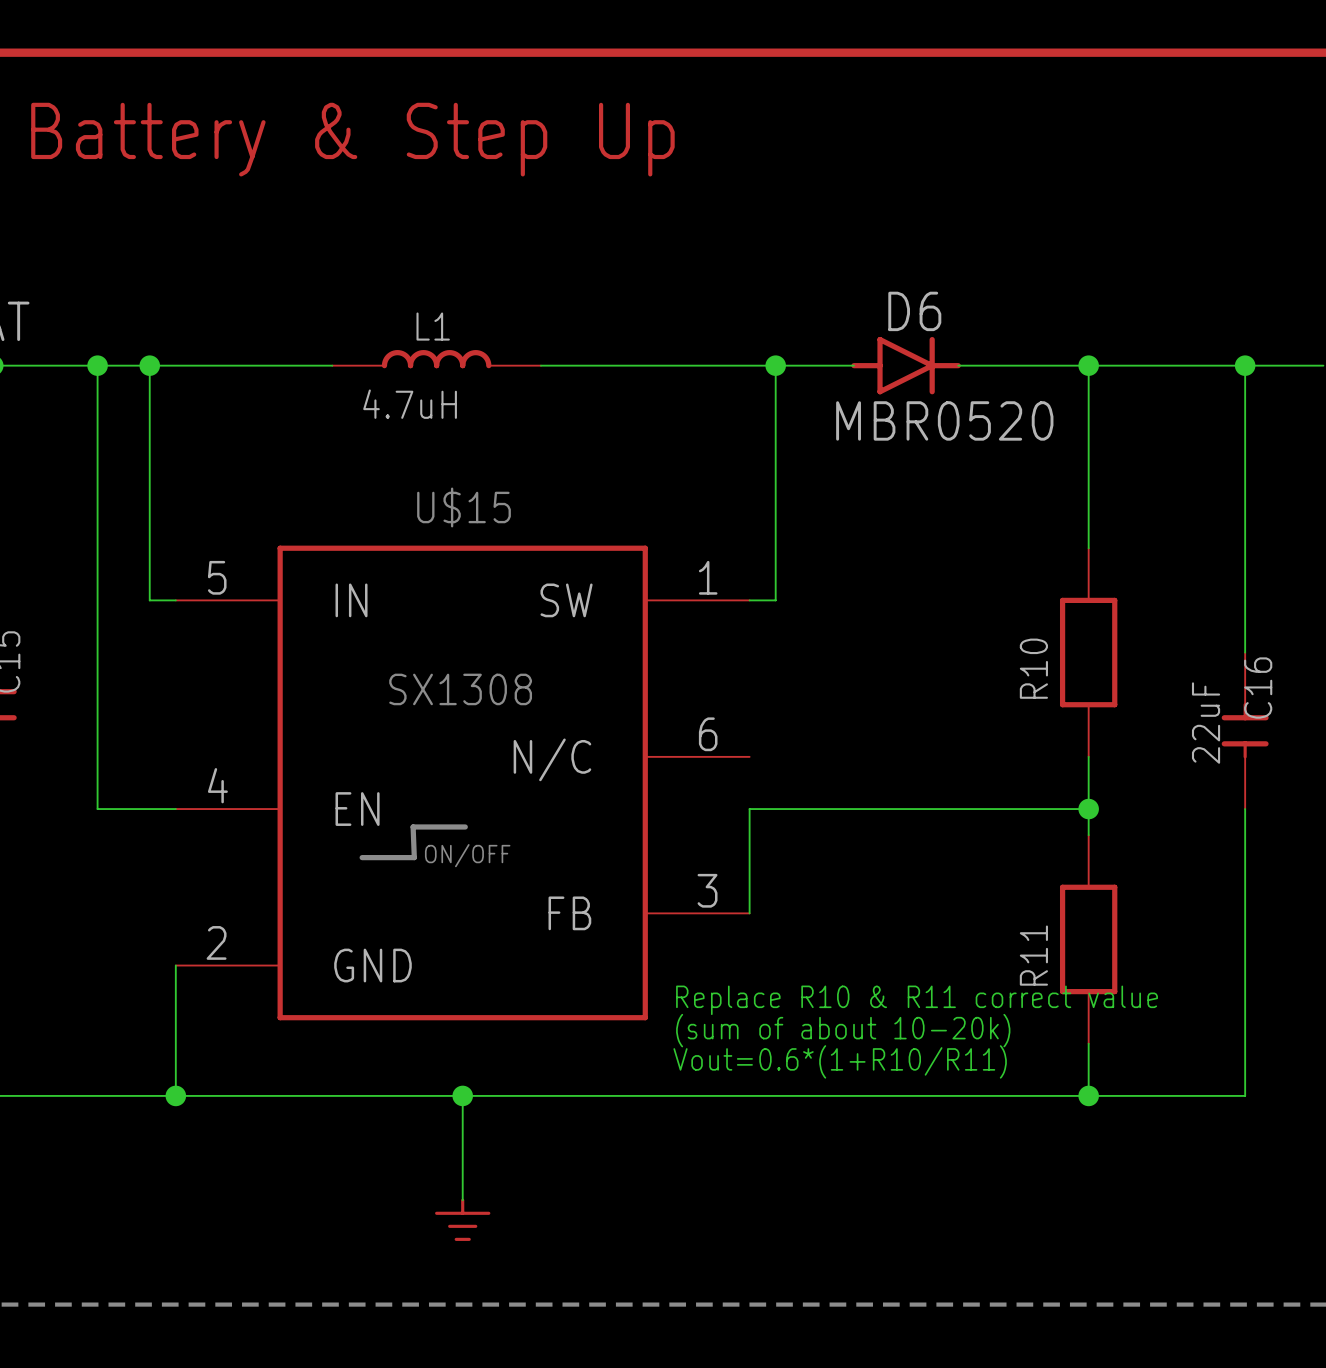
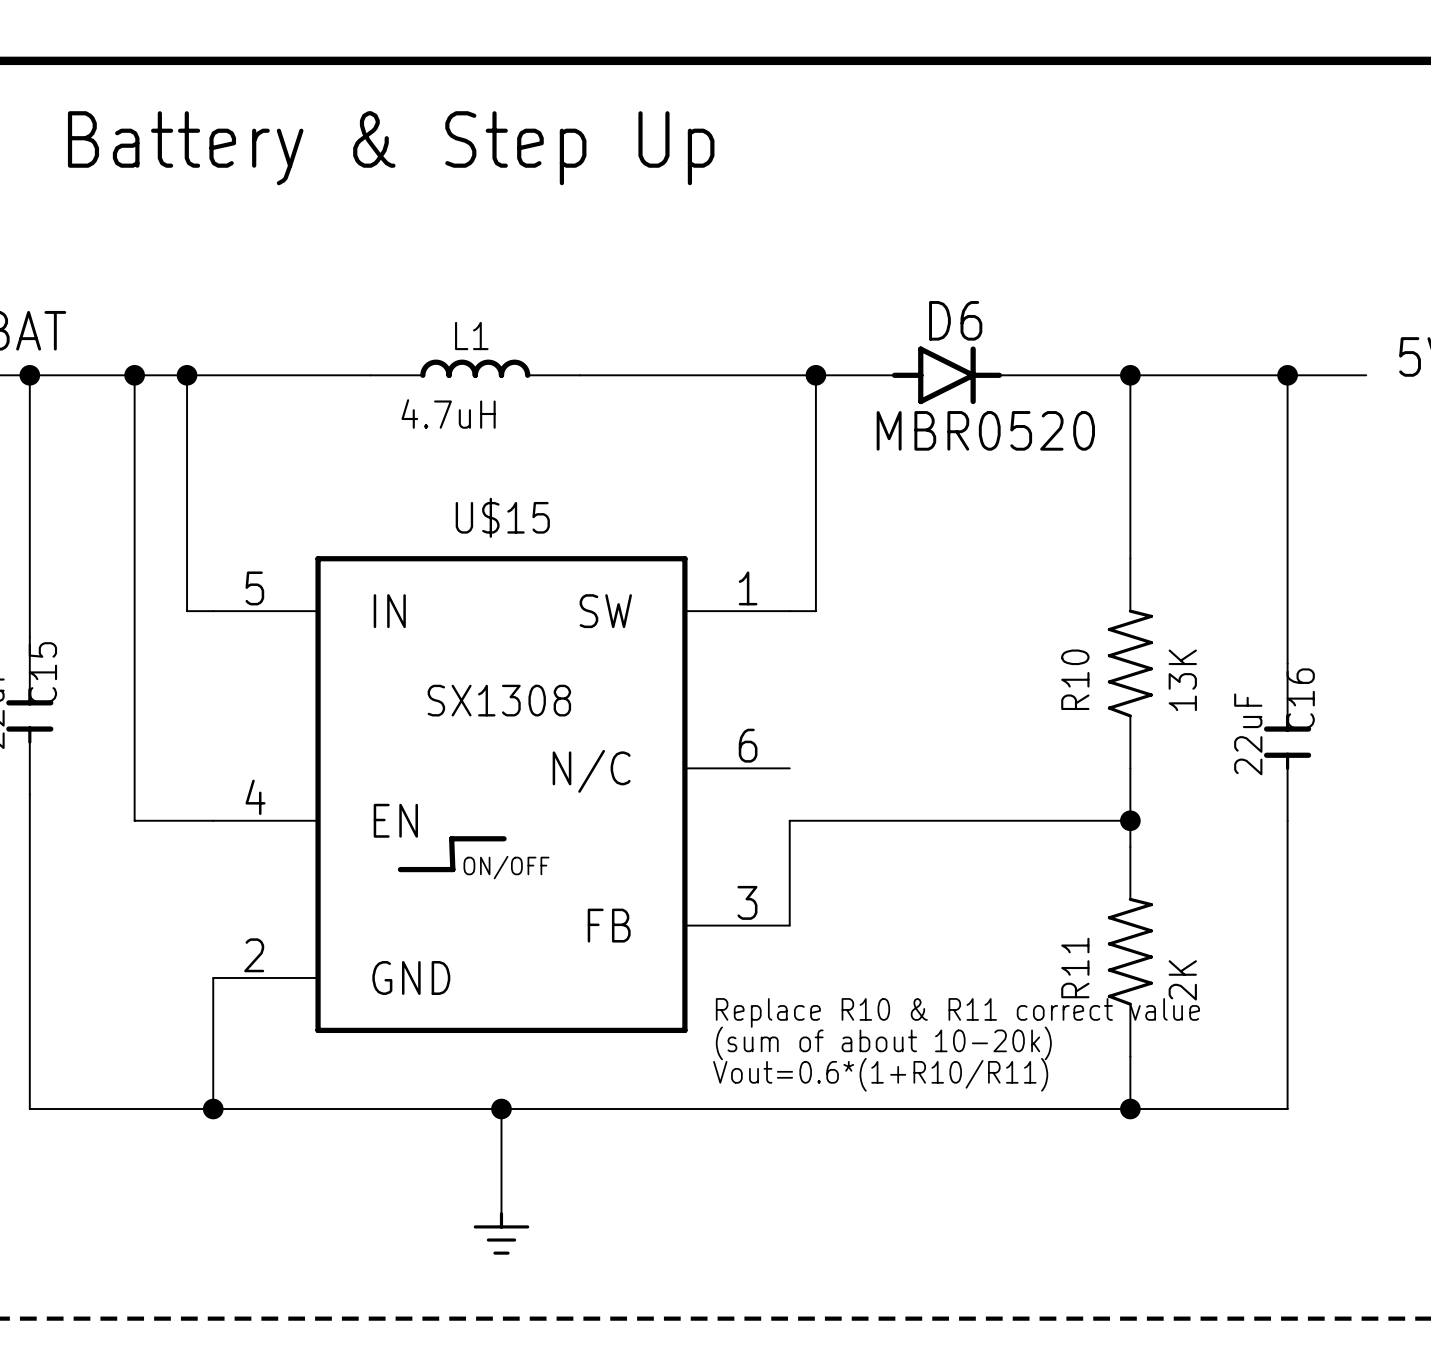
R10 symbol: [1059, 548, 1118, 757] -> [1107, 558, 1153, 769]
R10 value: none -> 13K (1182, 680)
R11 symbol: [1059, 835, 1118, 1044] -> [1107, 846, 1153, 1057]
R11 value: none -> 2K (1182, 980)

